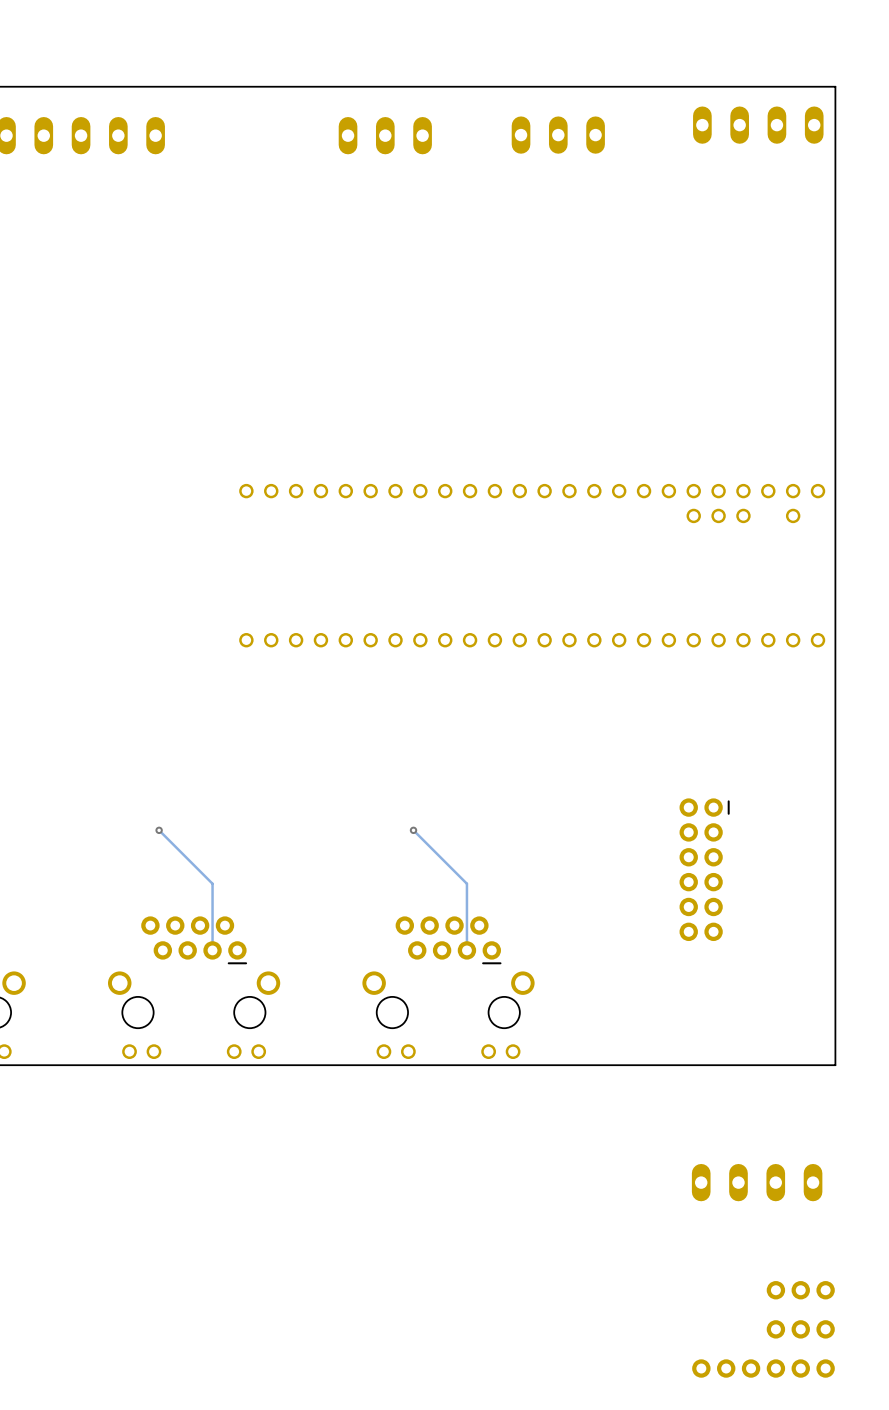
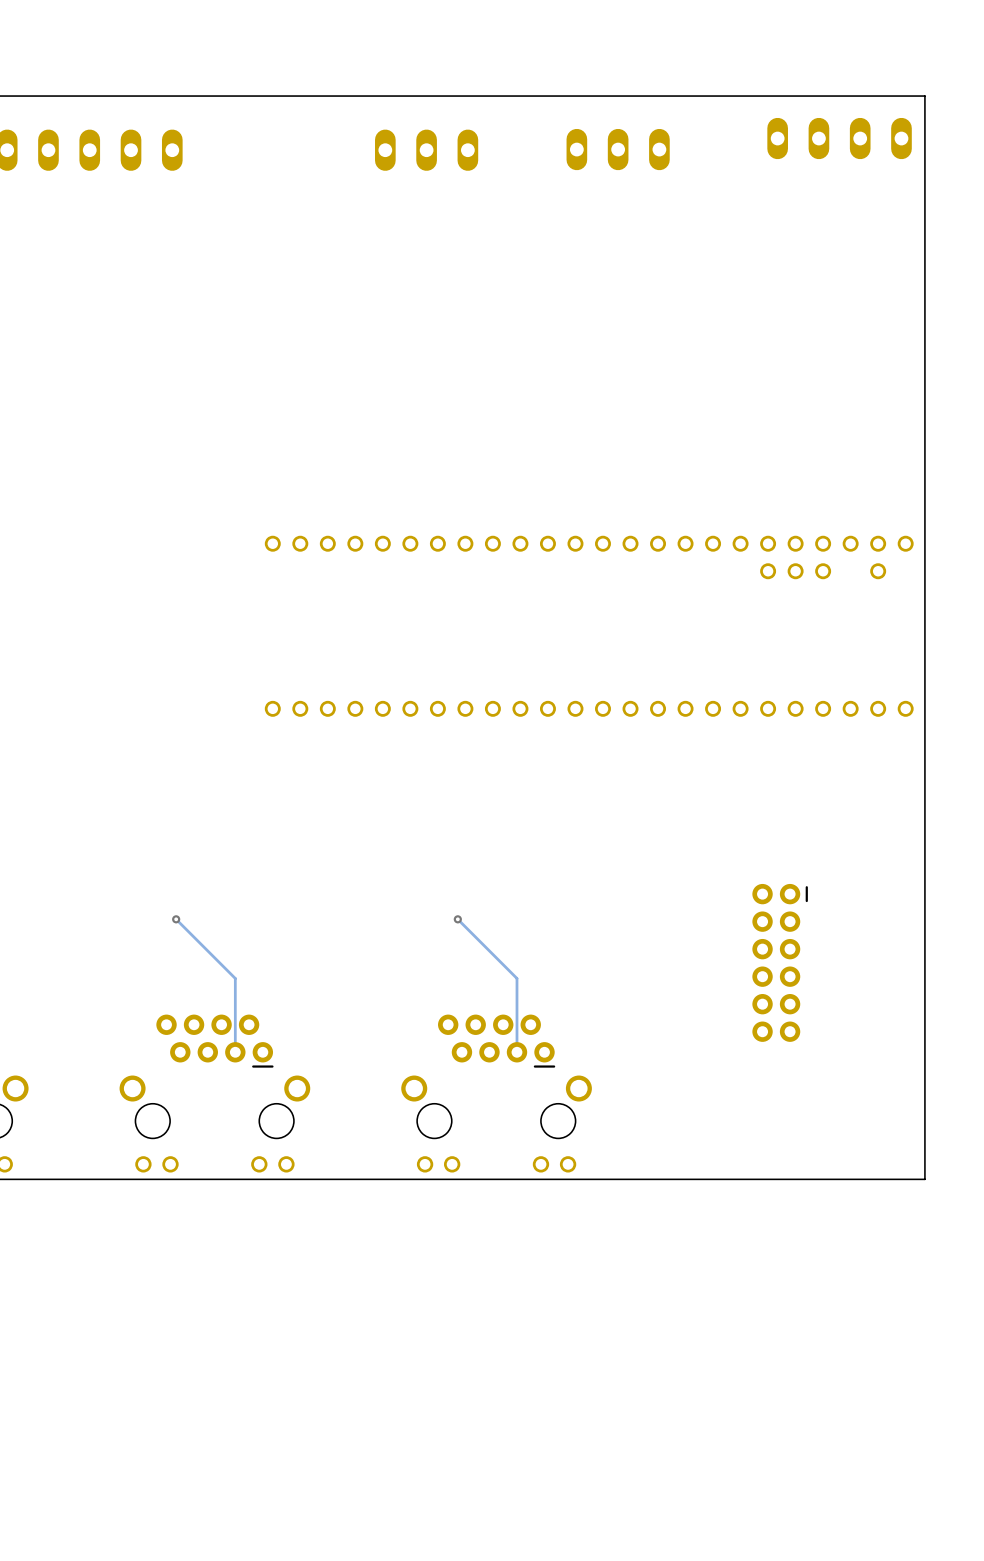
part: (757, 1182) -> none
part: (800, 1290) -> none
part: (800, 1329) -> none
part: (763, 1368) -> none

